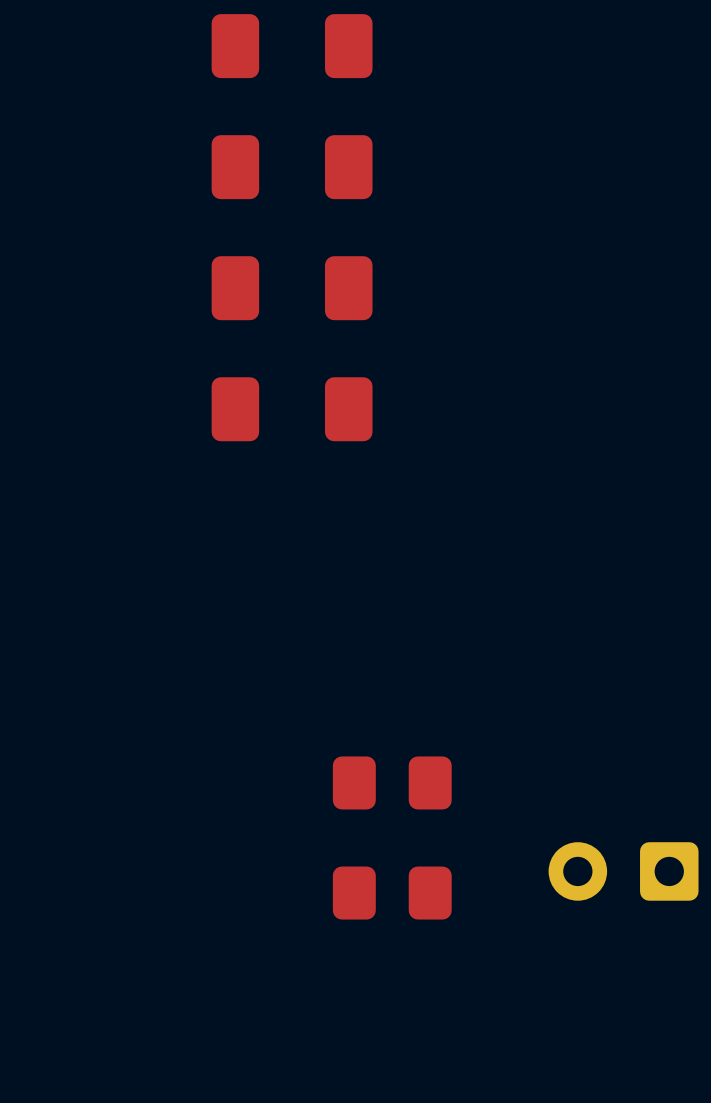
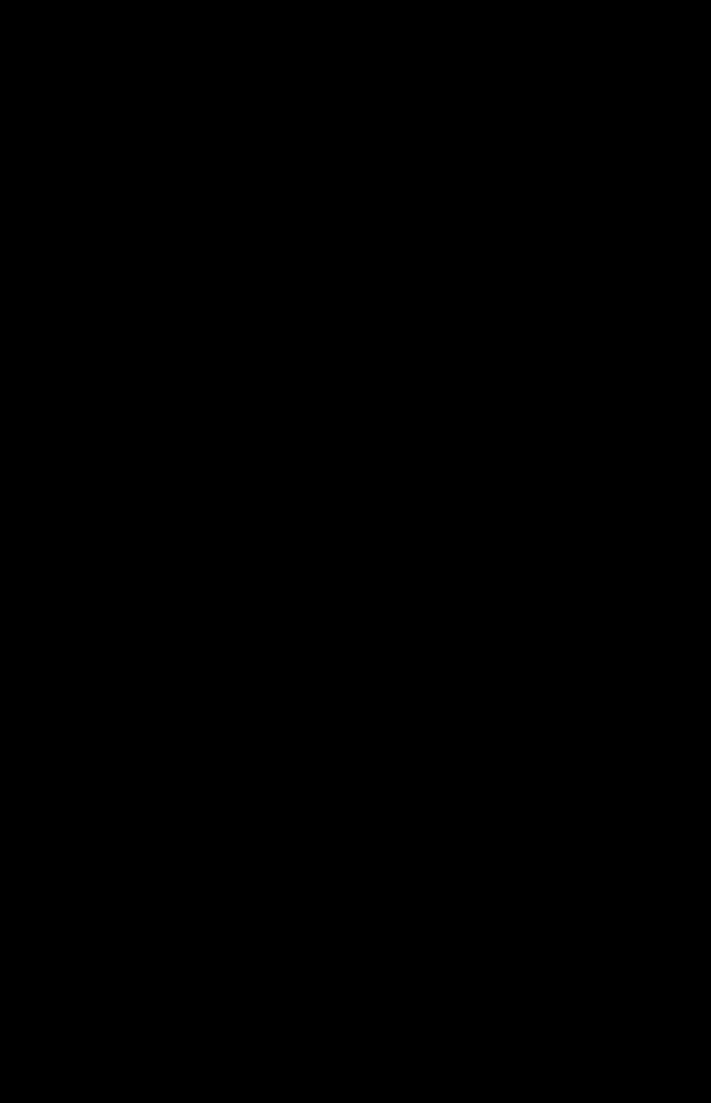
part: (292, 46) -> none
part: (292, 167) -> none
part: (292, 288) -> none
part: (292, 409) -> none
part: (392, 782) -> none
part: (623, 871) -> none
part: (392, 893) -> none

